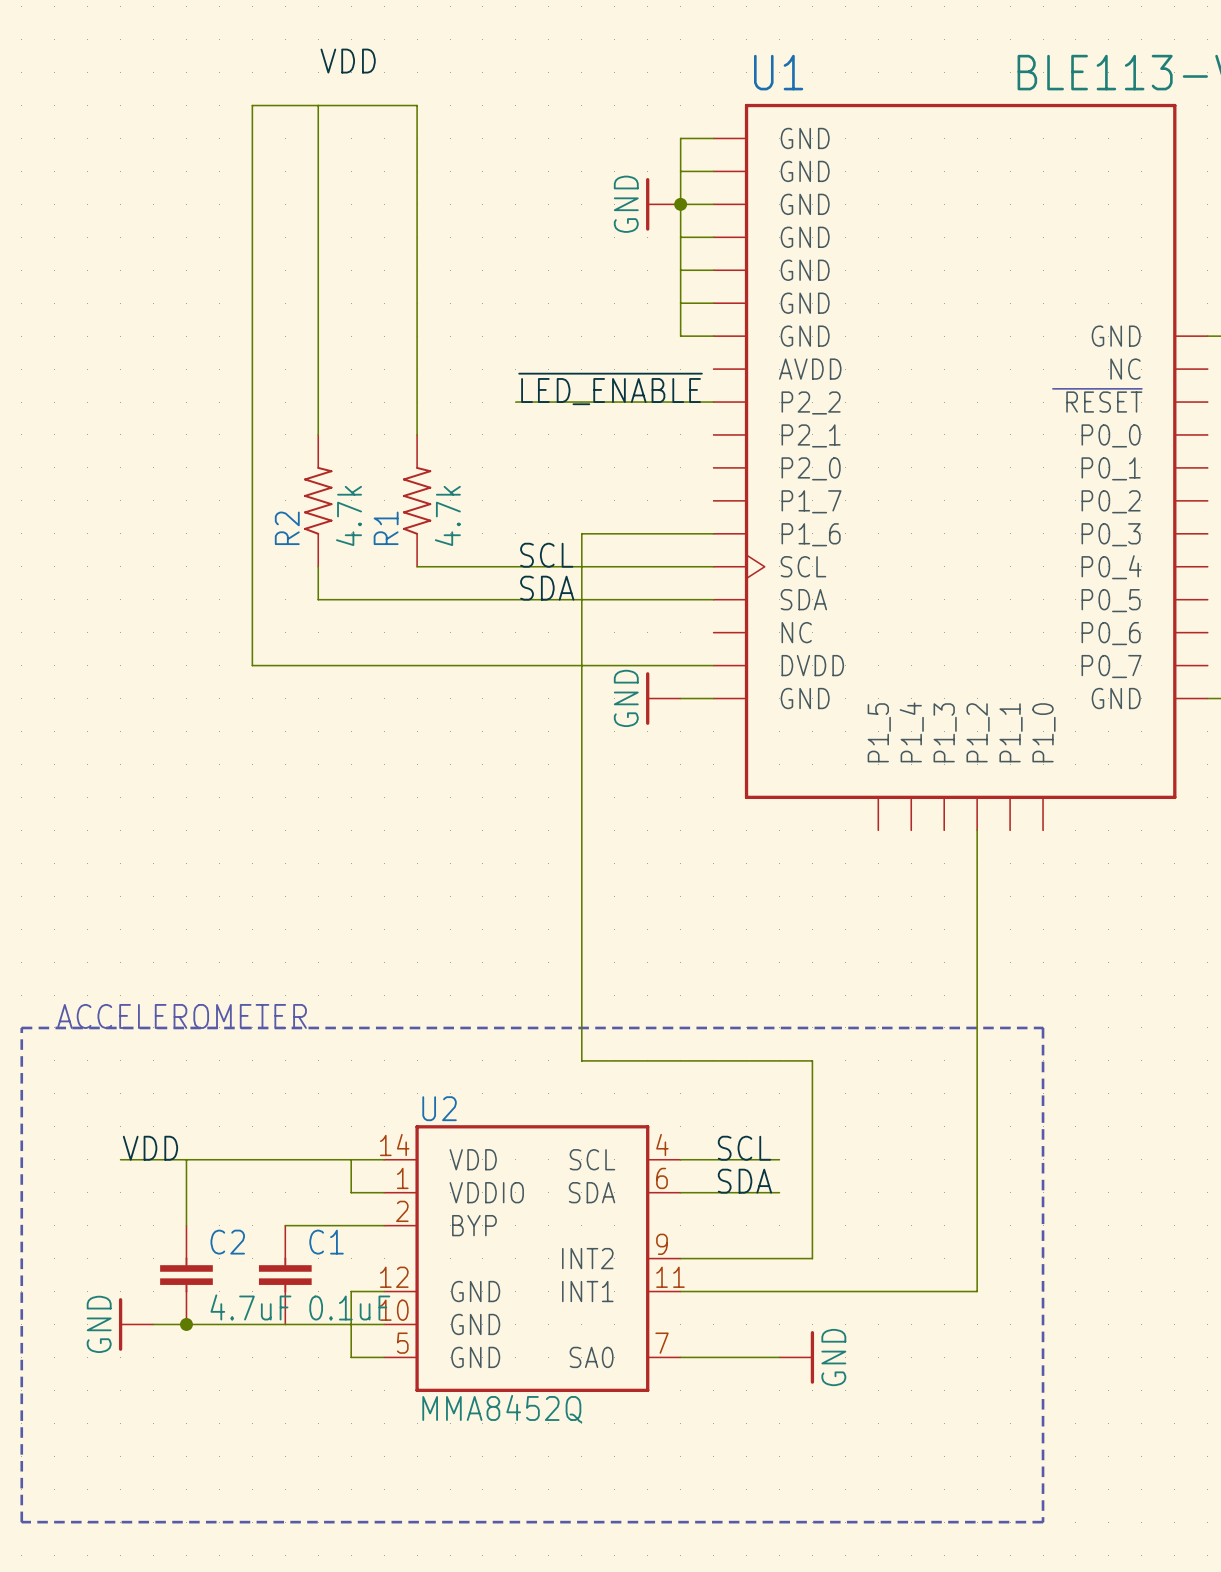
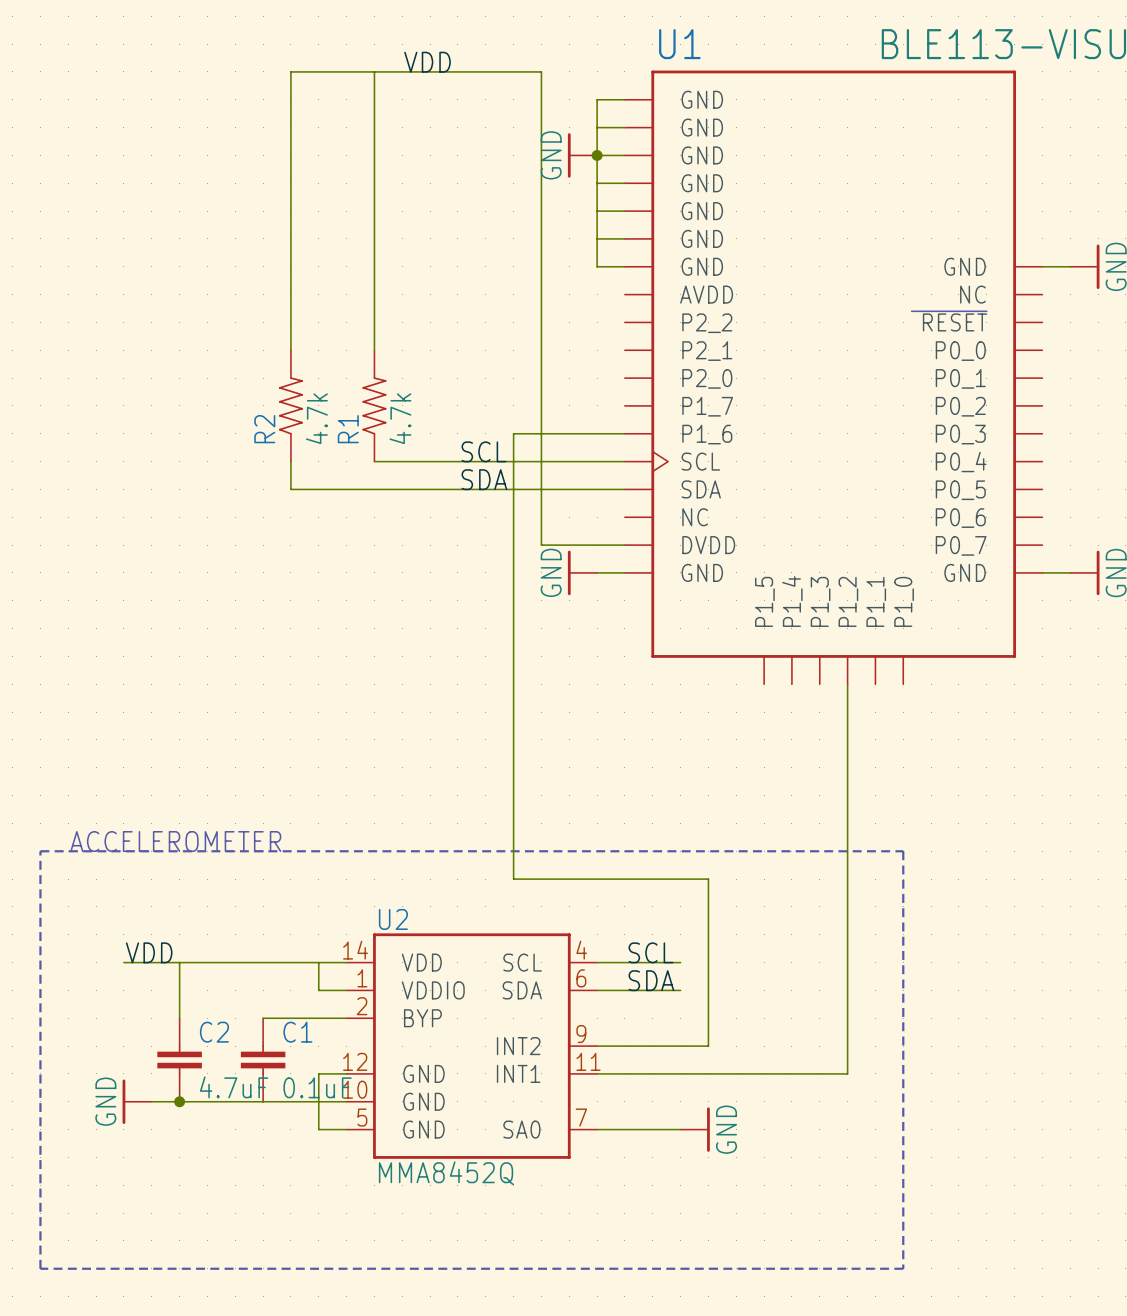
label position: VDD (348, 61) -> VDD (427, 62)
wire: (318, 105) (252, 105) (252, 665) (614, 665) -> (374, 71) (541, 71) (541, 545)
label: ~{LED_ENABLE} (610, 388) -> none
wire: (515, 402) (713, 402) -> none

